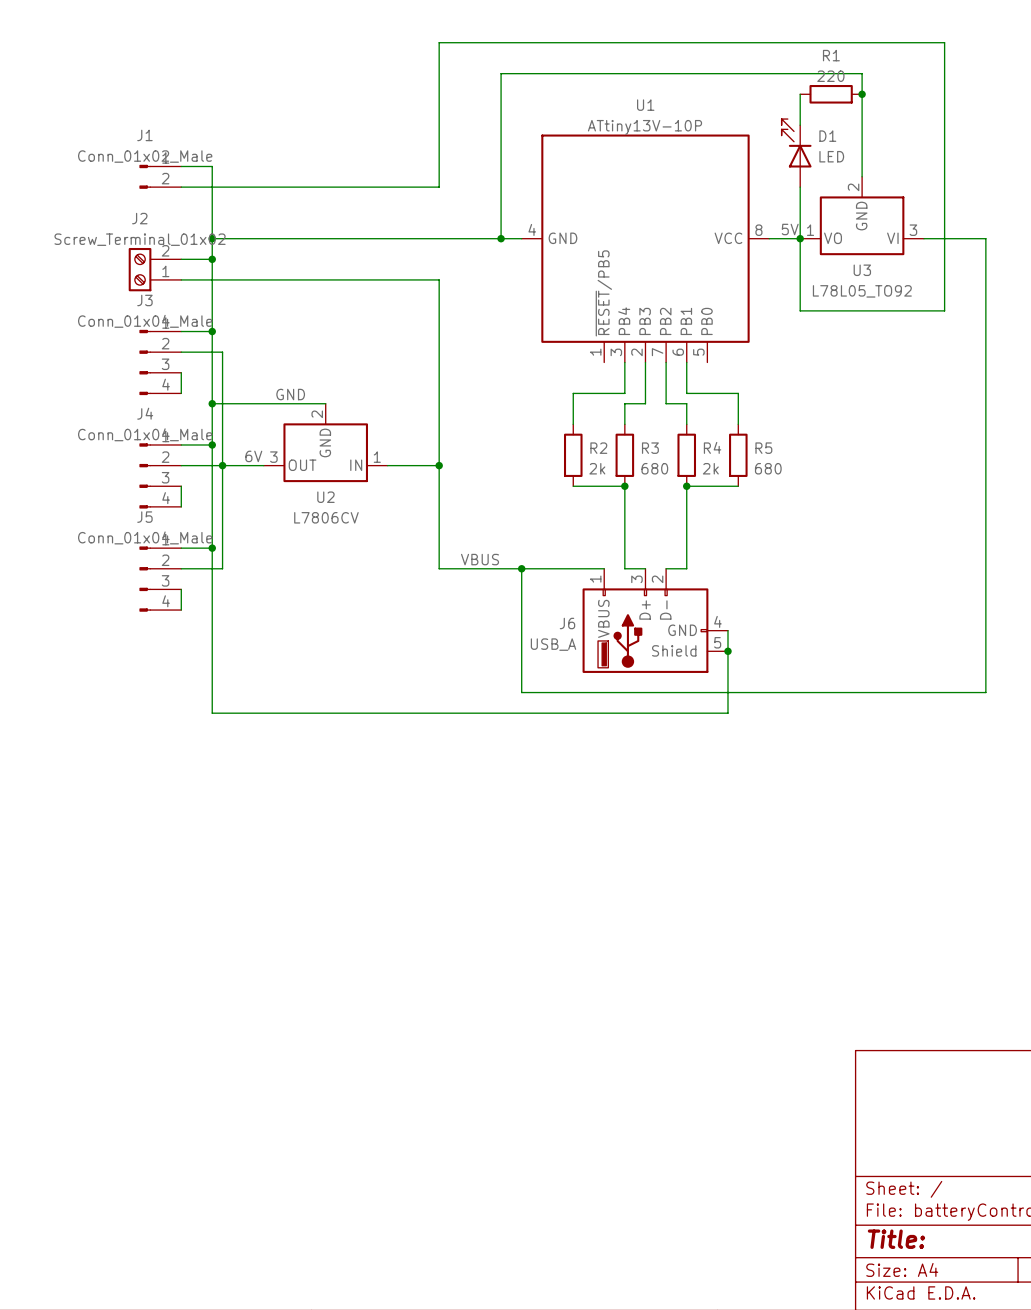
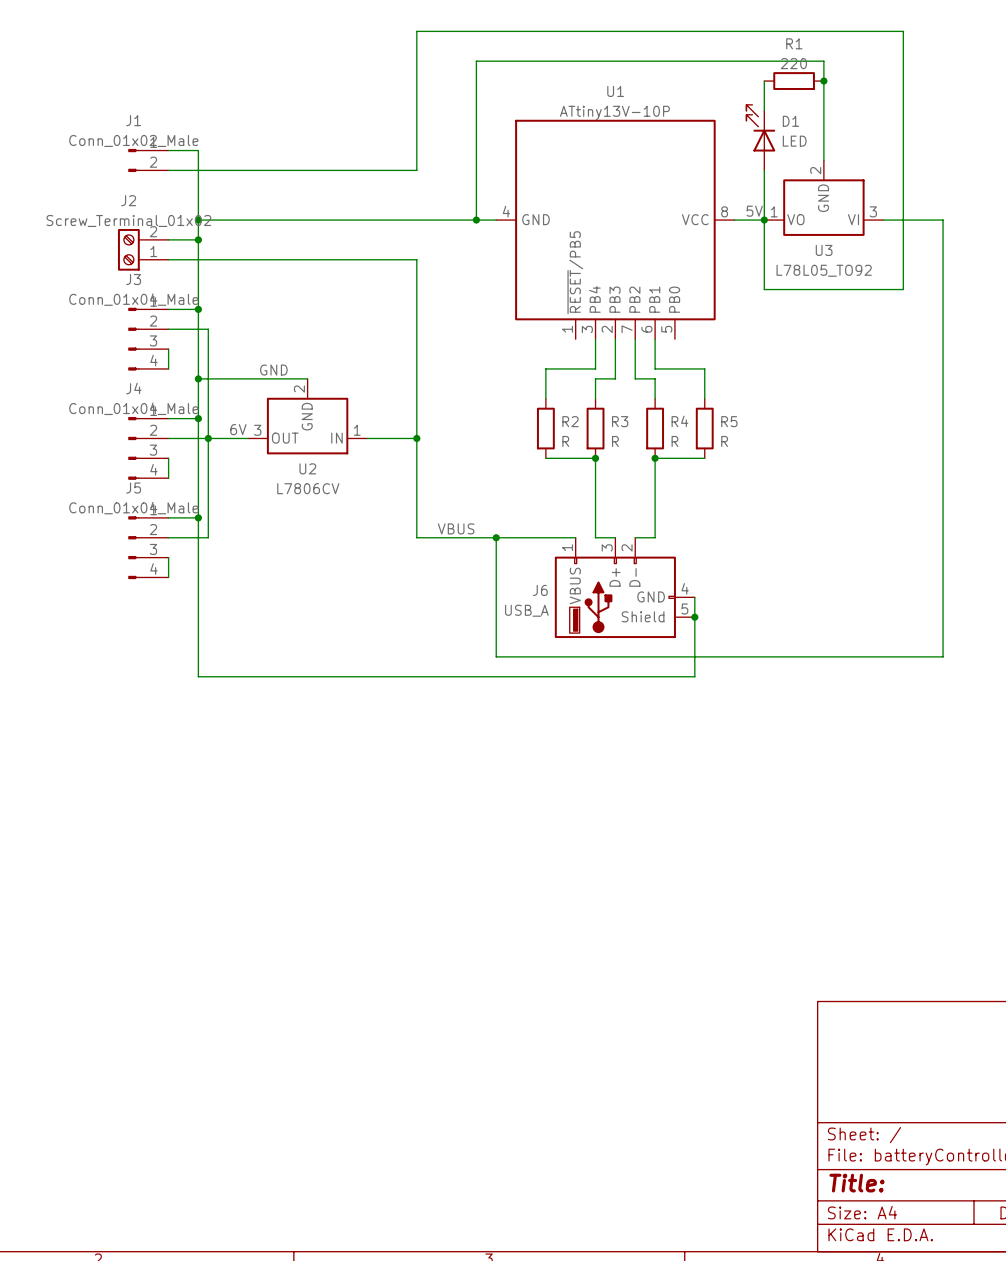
R2 value: 2k (597, 468) -> R (565, 441)
R3 value: 680 (654, 468) -> R (615, 441)
R4 value: 2k (710, 468) -> R (674, 441)
R5 value: 680 (768, 468) -> R (724, 441)

